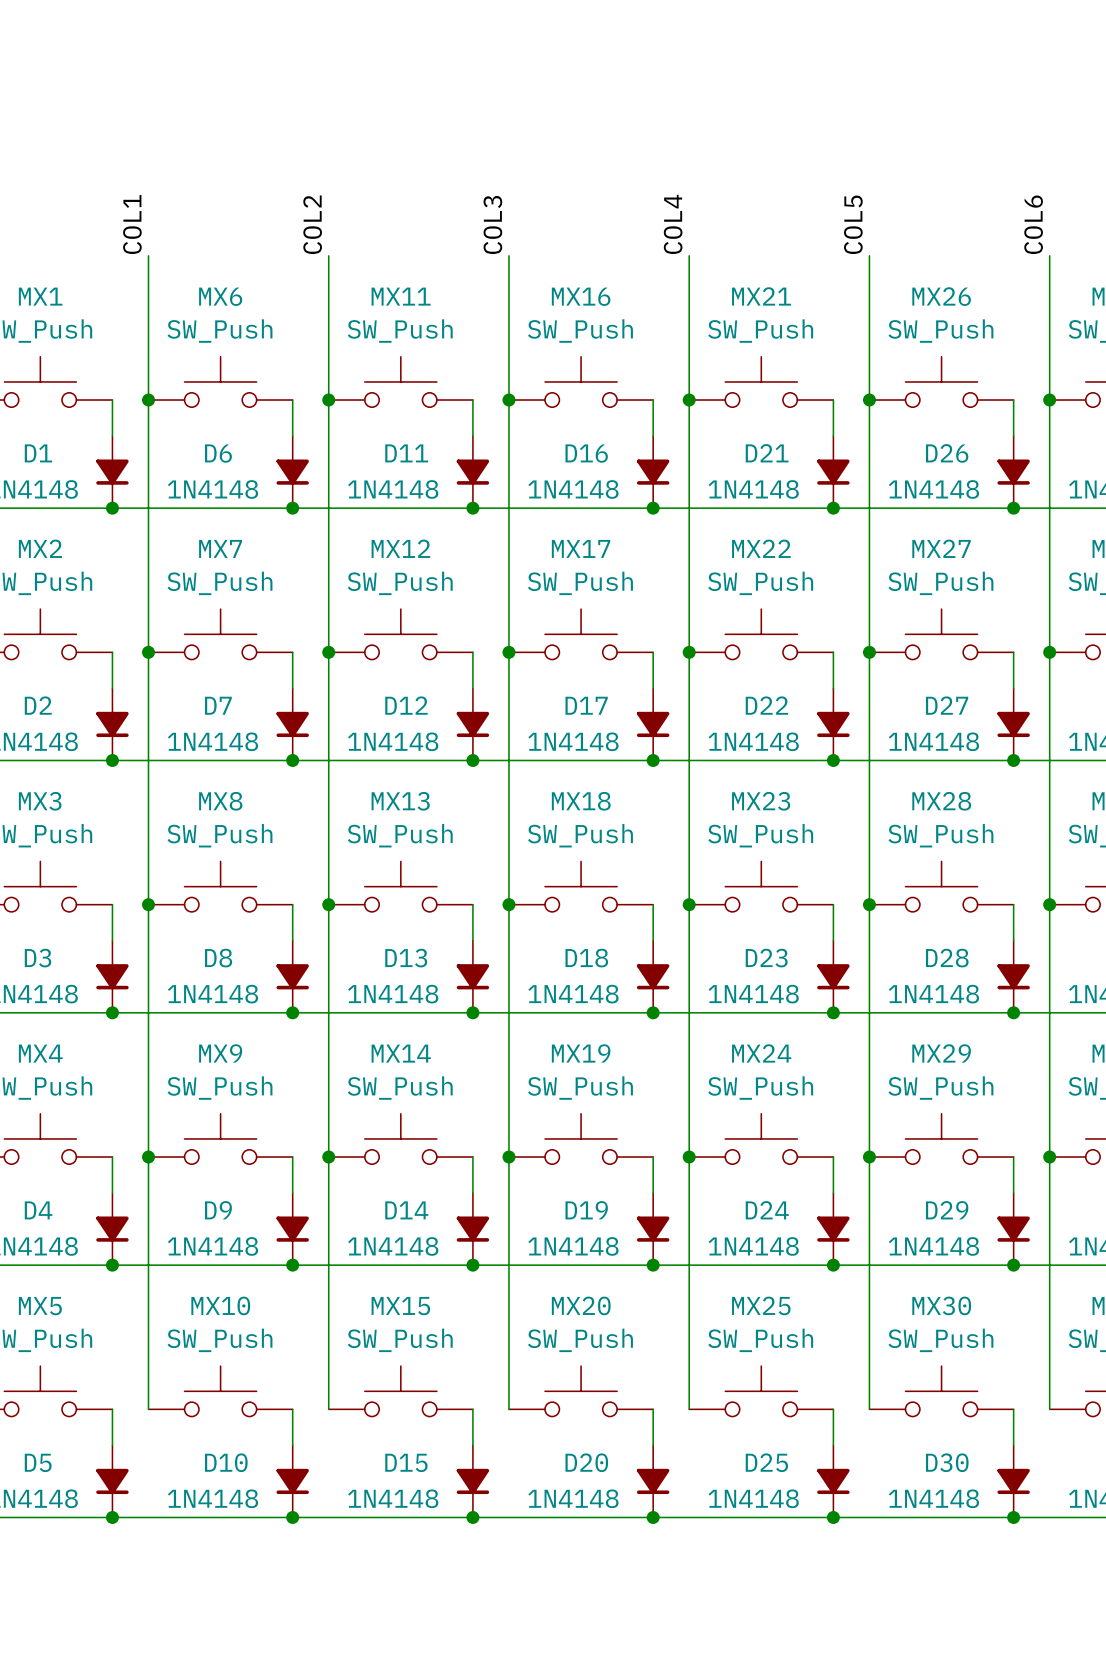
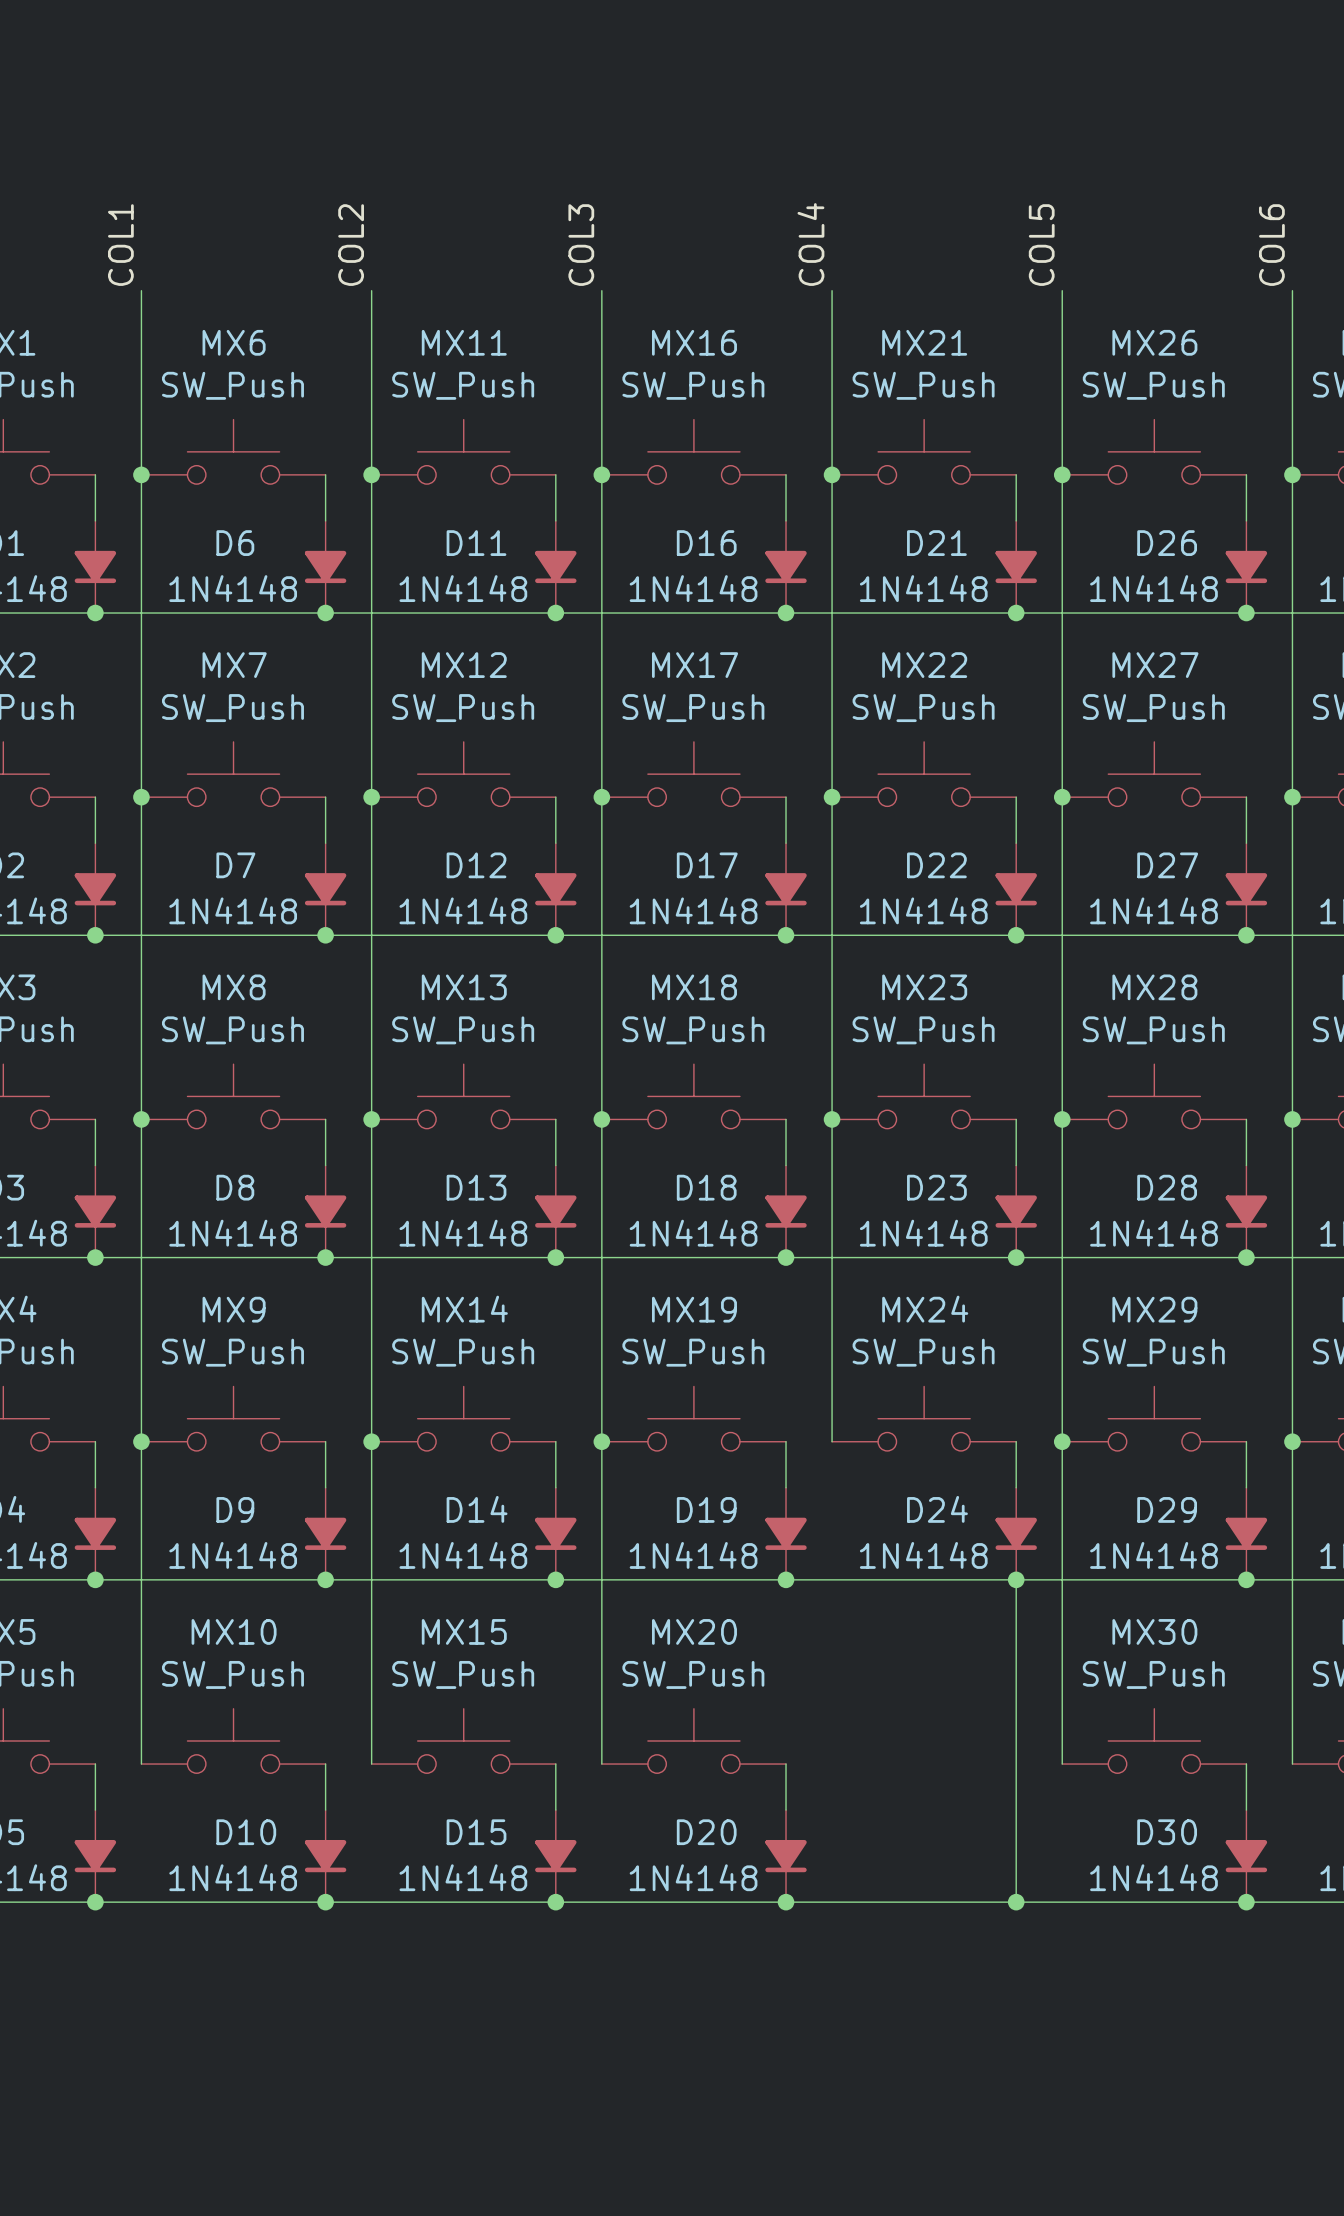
wire: (689, 1157) (689, 1409) -> none
junction: (689, 1157) -> none
wire: none -> (1016, 1579) (1016, 1764)
MX25: SW_Push (761, 1391) -> none
D25: 1N4148 (833, 1481) -> none

